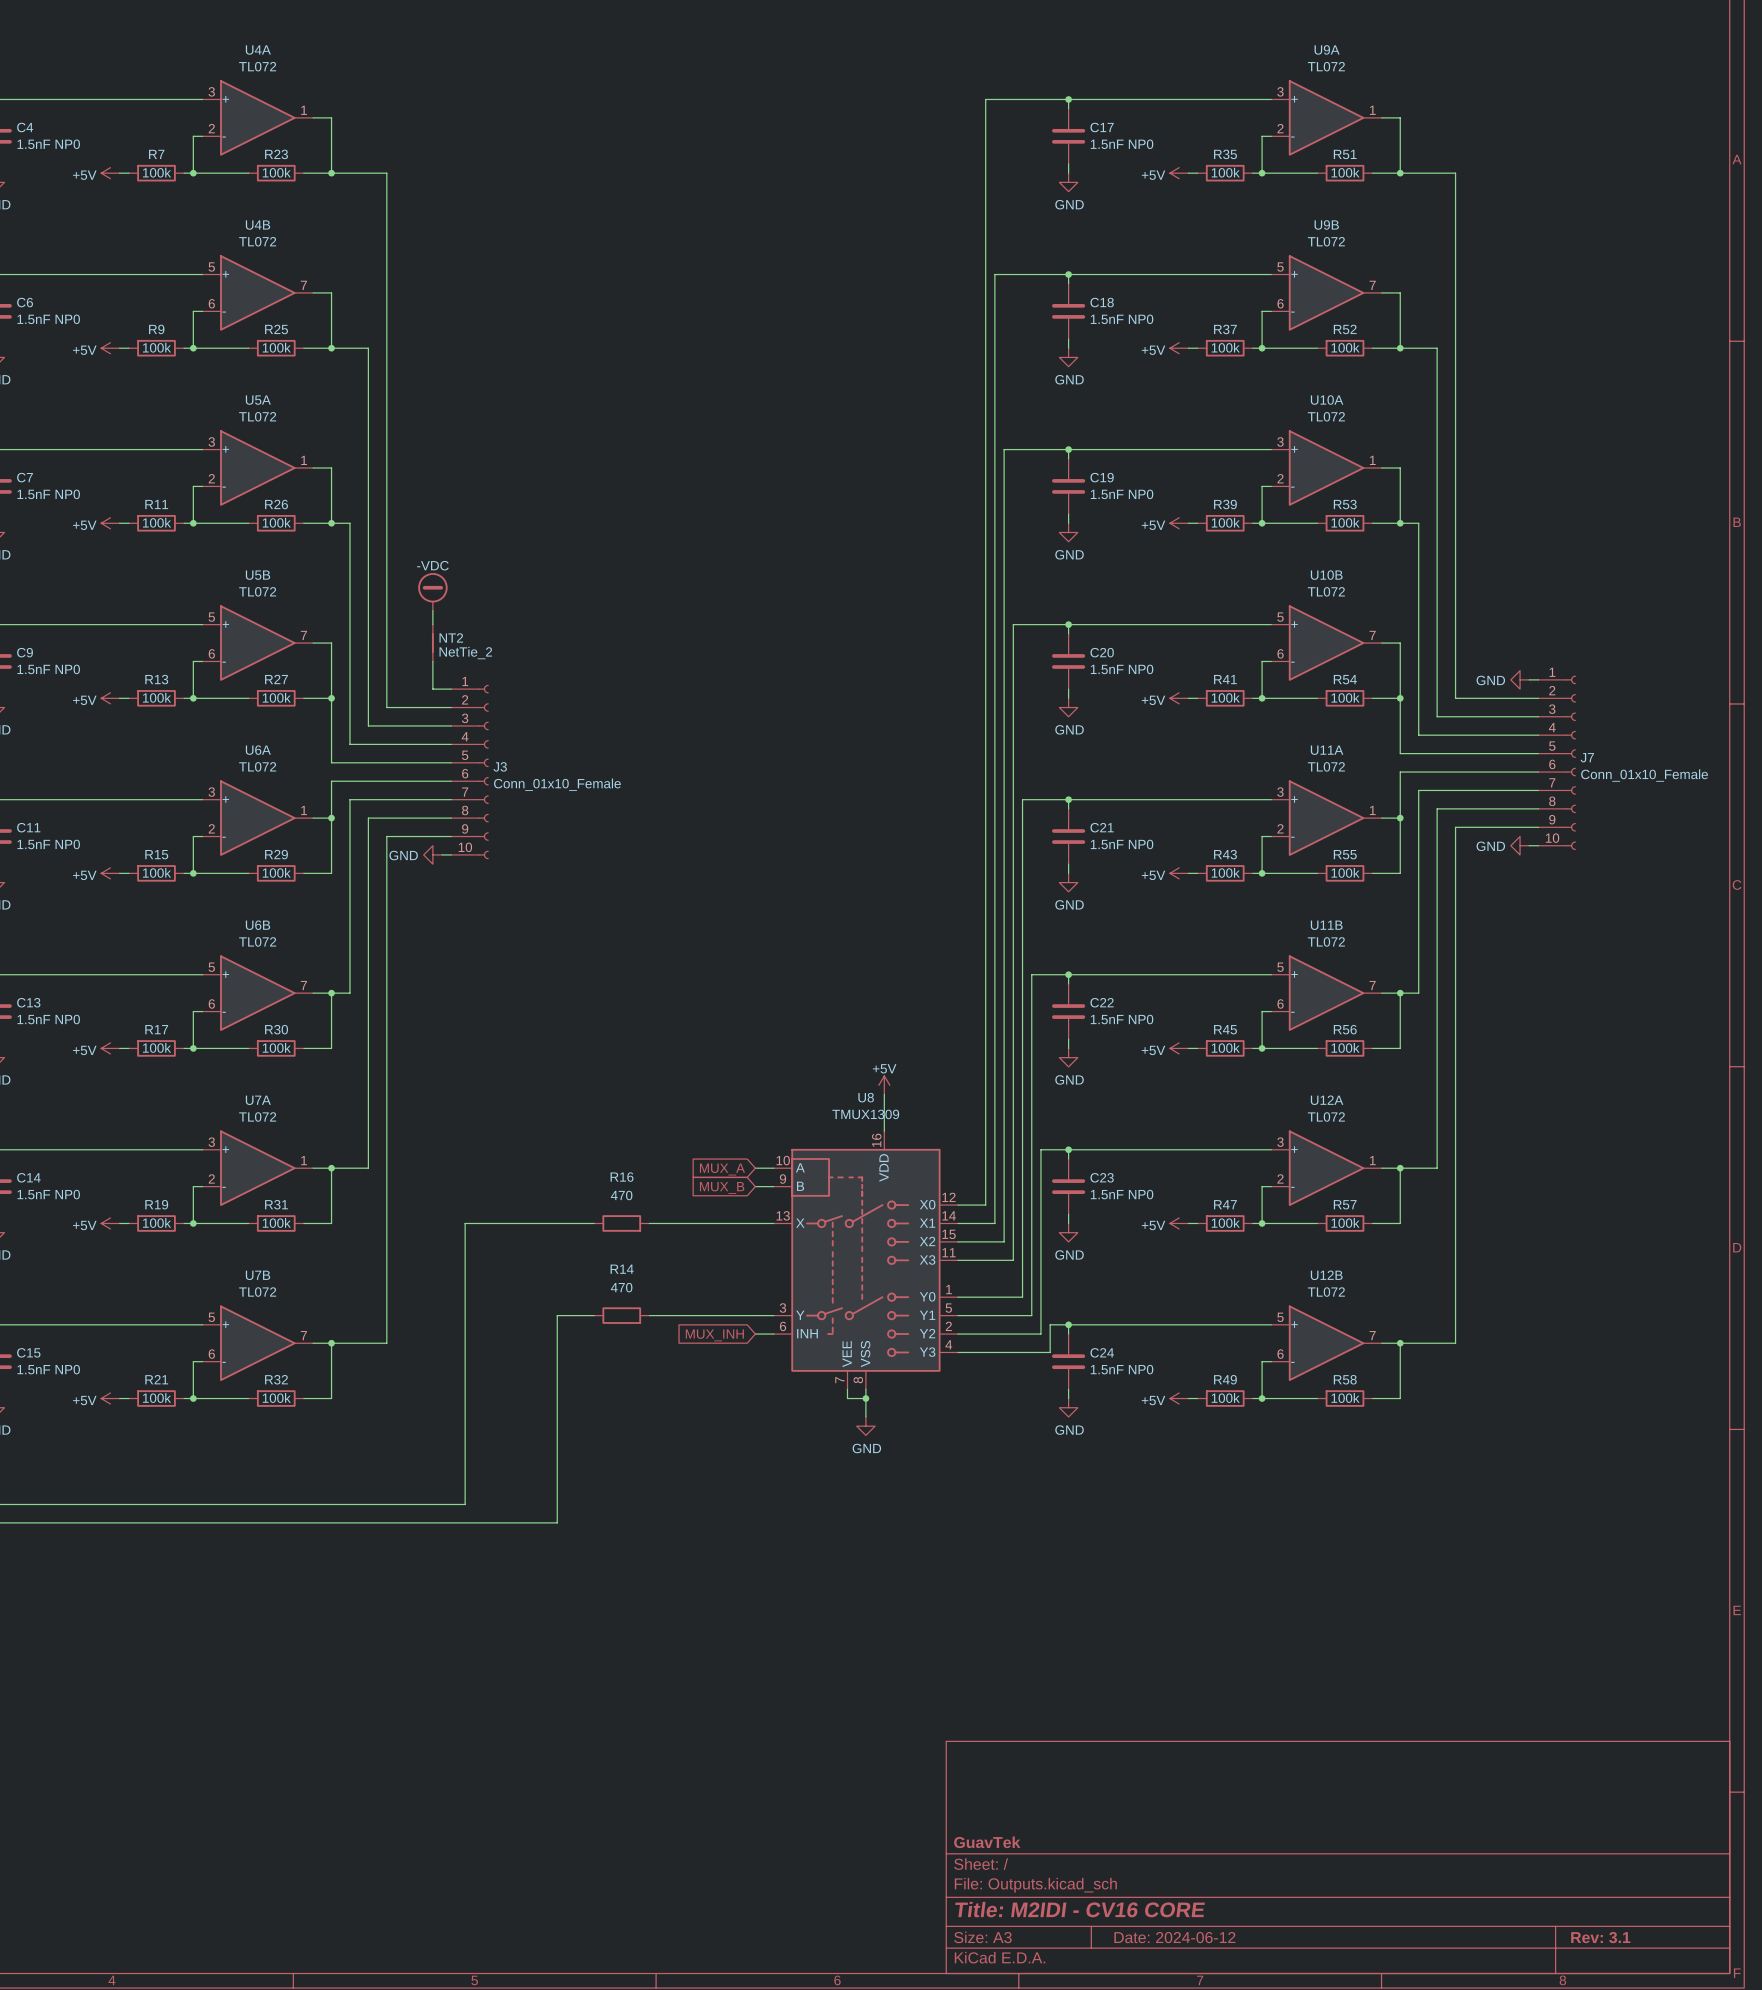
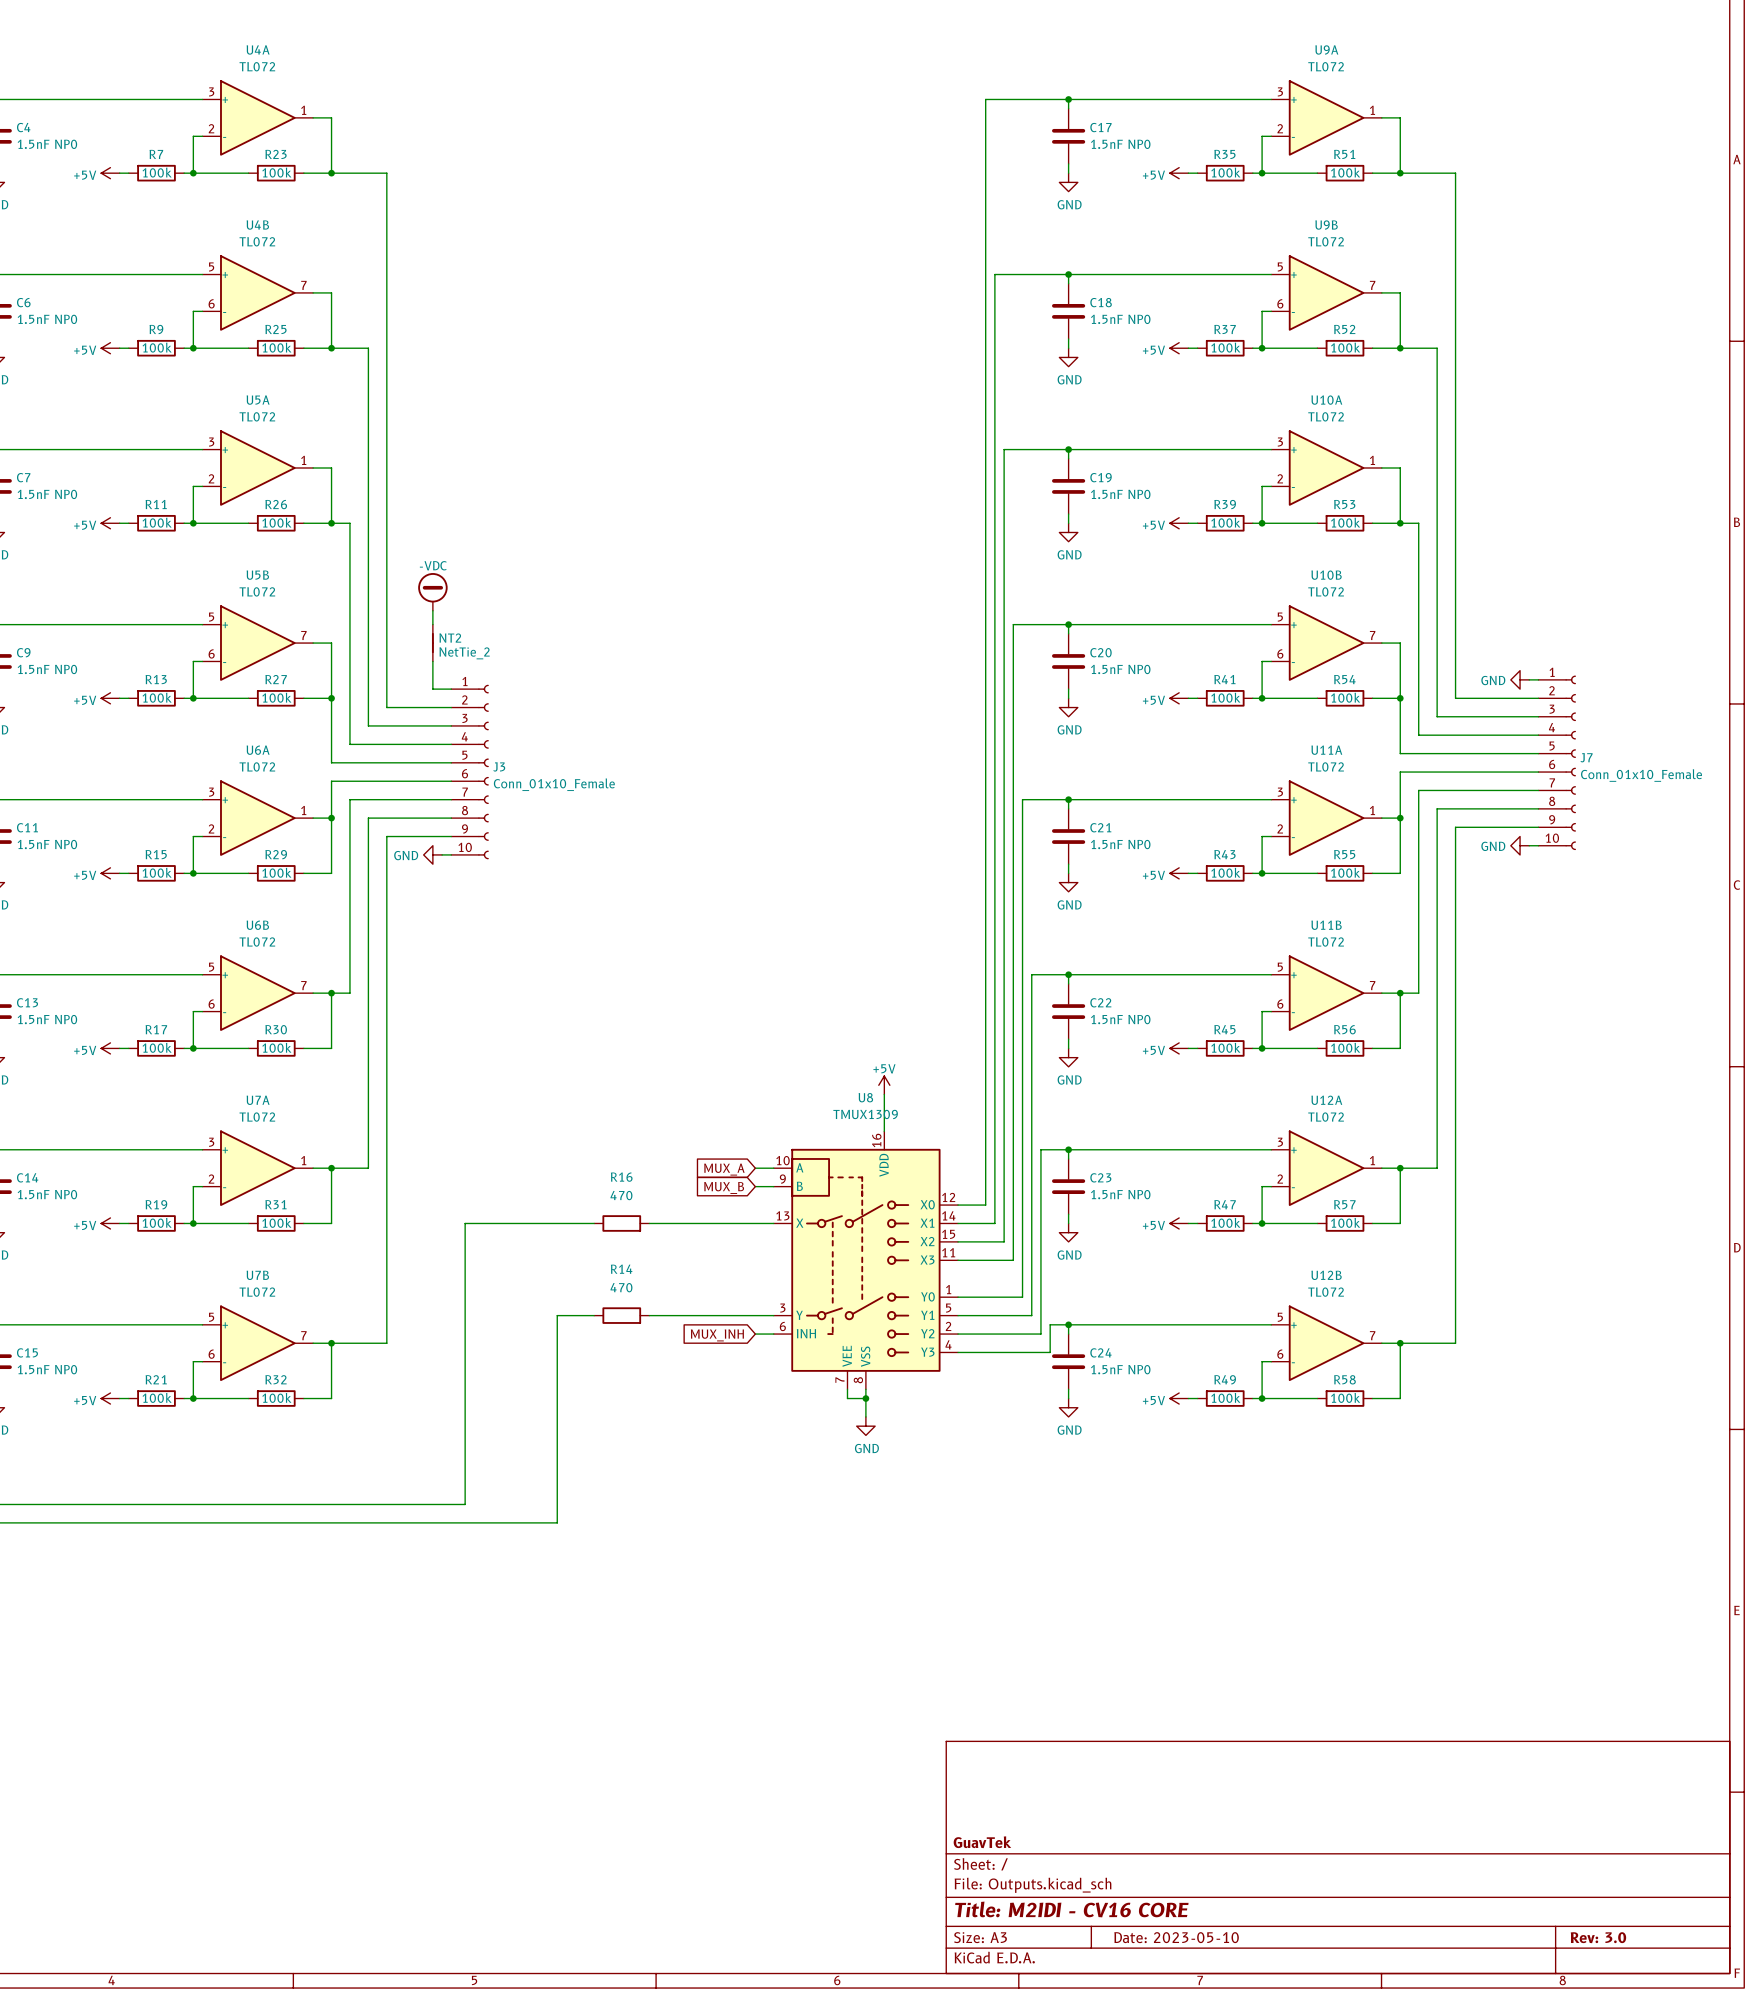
title block: Date: 2024-06-12 (1174, 1937) -> Date: 2023-05-10 (1176, 1937)
title block: Rev: 3.1 (1600, 1937) -> Rev: 3.0 (1598, 1937)

